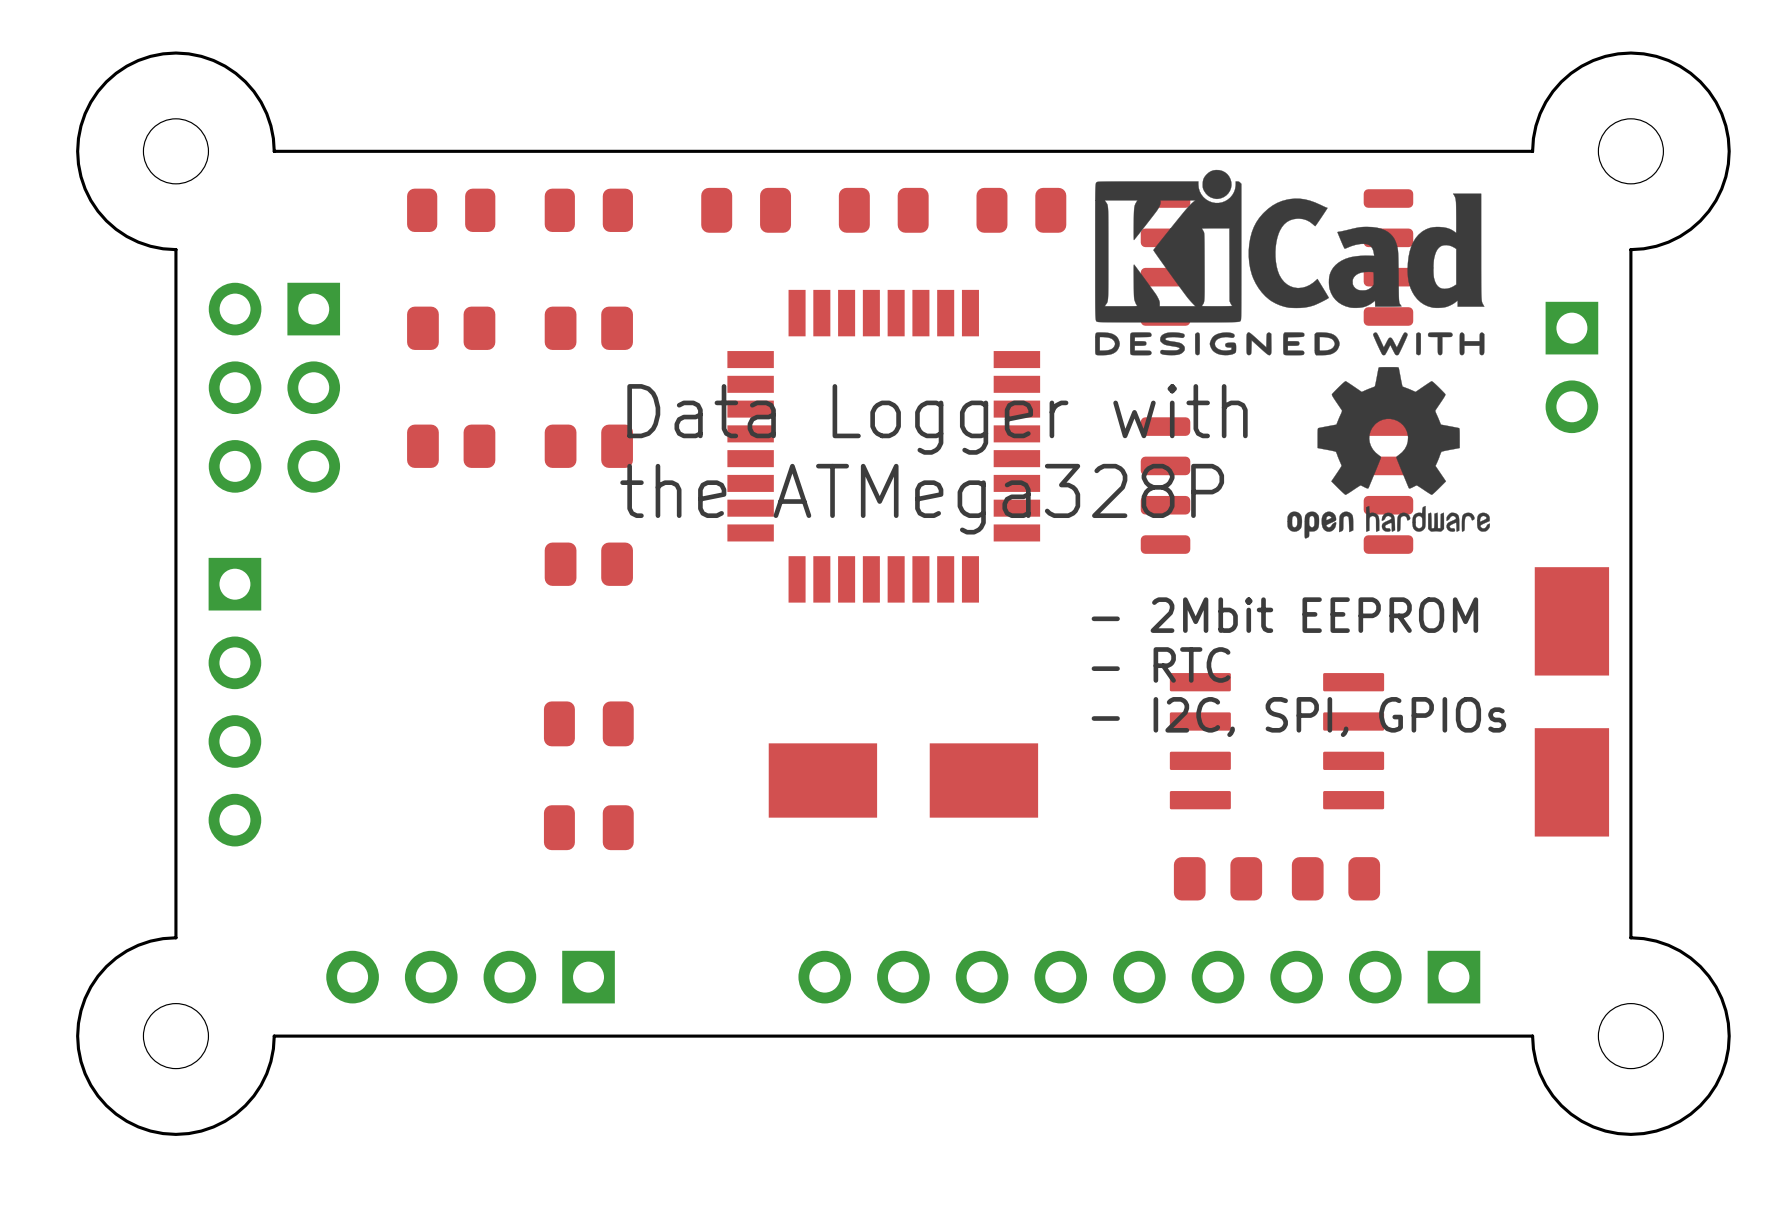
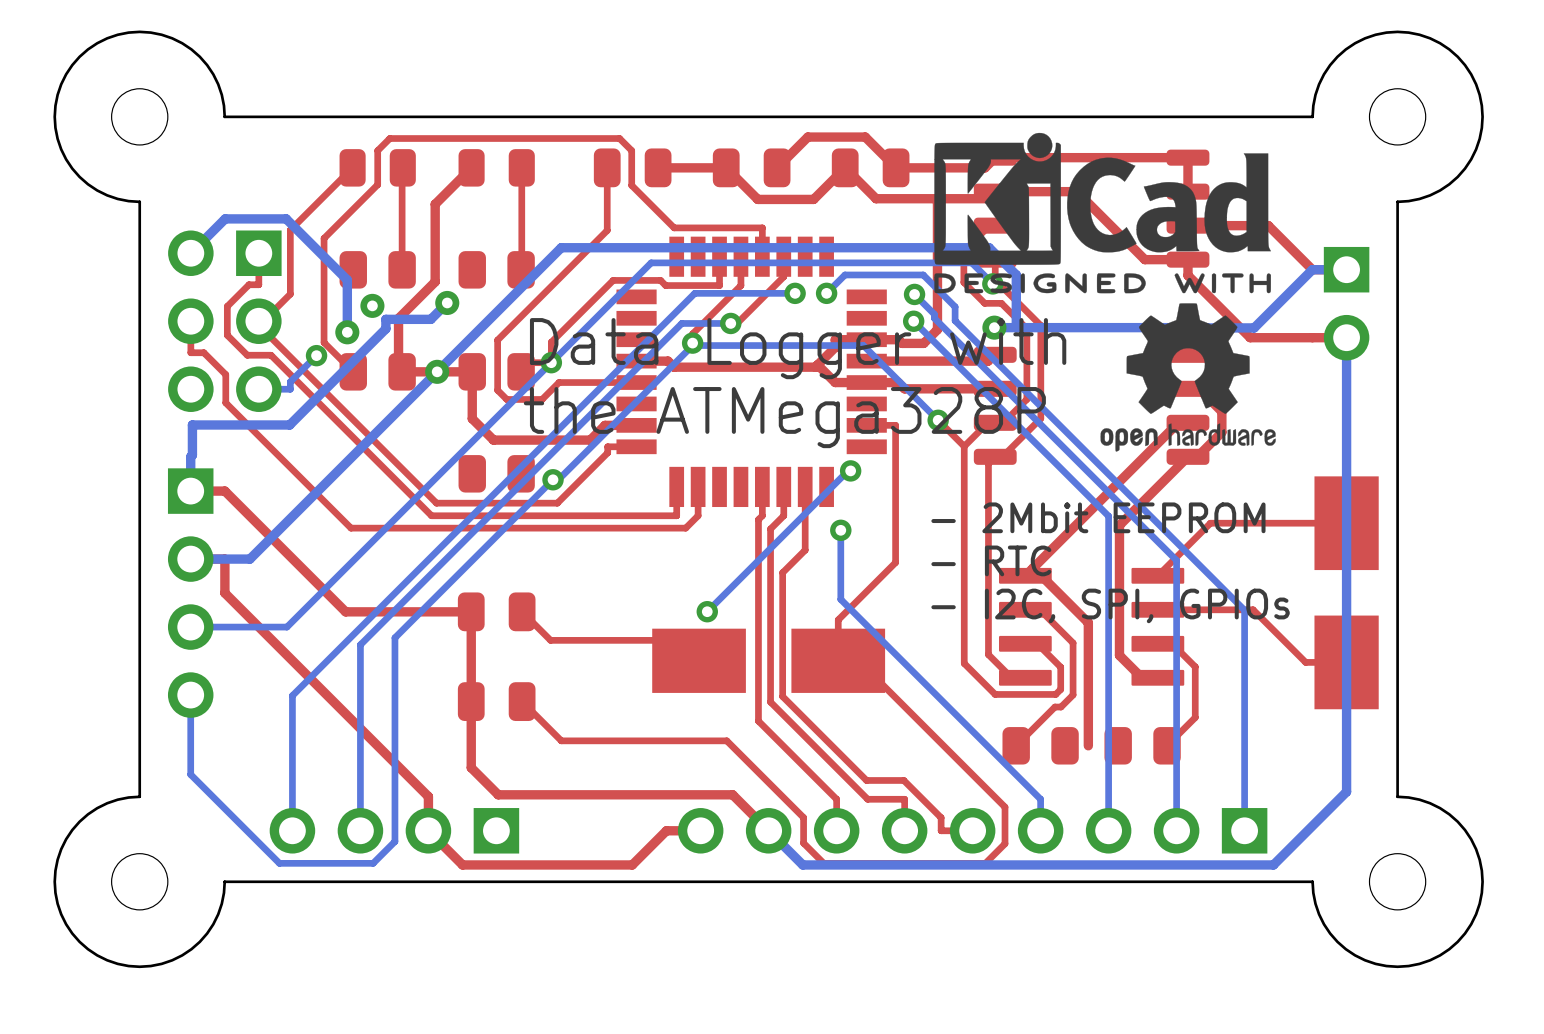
top track: none -> (352, 167) (290, 230) (290, 294) (263, 321)
top track: none -> (402, 167) (402, 269)
top track: none -> (471, 167) (435, 204) (435, 281) (398, 318) (398, 368) (402, 371) (472, 371) (472, 418) (493, 440) (590, 440) (605, 425) (636, 425)
top track: none -> (521, 167) (521, 269)
top track: none -> (607, 167) (607, 230) (497, 340) (497, 390) (506, 399) (542, 399) (559, 382) (636, 382)
top track: none -> (658, 167) (726, 167) (757, 199) (813, 199) (845, 167) (876, 198) (988, 198) (995, 191) (1076, 191) (1144, 259) (1187, 259) (1187, 275) (1250, 337) (1346, 337)
top track: none -> (777, 167) (807, 137) (865, 137) (896, 167) (985, 167) (995, 157) (1187, 157) (1187, 225) (1268, 225) (1312, 269) (1346, 269)
top track: none -> (937, 198) (937, 329) (923, 343) (901, 343) (898, 339) (835, 339) (835, 347) (815, 367) (674, 367) (668, 361) (636, 361)
top track: none -> (995, 225) (989, 225) (963, 251) (963, 282) (984, 303) (1001, 303) (1026, 328) (1026, 399) (1003, 422) (987, 422) (964, 446)
bottom track: none -> (190, 253) (225, 218) (286, 218) (347, 280) (347, 332)
top track: none -> (258, 253) (258, 284) (248, 284) (227, 306) (227, 335) (247, 355) (271, 355) (431, 515) (676, 515) (676, 486)
top track: none -> (719, 256) (719, 285) (665, 285) (660, 280) (613, 280) (551, 342) (551, 362) (530, 362) (521, 371)
top track: none -> (740, 256) (740, 285) (692, 333) (692, 343)
top track: none -> (762, 256) (762, 227) (674, 227) (631, 185) (631, 150) (619, 138) (389, 138) (377, 150) (377, 184) (324, 238) (324, 342) (353, 371)
top track: none -> (783, 256) (783, 276) (737, 323) (730, 323)
top track: none -> (995, 259) (995, 281) (992, 283) (999, 283) (1040, 325) (1040, 418) (1002, 456) (995, 456) (988, 463) (988, 654) (1011, 677) (1025, 677)
bottom track: none -> (1346, 269) (1312, 269) (1254, 327) (1206, 327)
bottom track: none -> (992, 283) (971, 262) (651, 262) (286, 627) (190, 627)
via: none -> (992, 283)
bottom track: none -> (795, 293) (694, 293) (292, 695) (292, 830)
via: none -> (795, 293)
bottom track: none -> (826, 293) (844, 274) (923, 274) (955, 306) (955, 320) (1244, 610) (1244, 830)
via: none -> (826, 293)
bottom track: none -> (914, 294) (934, 314) (934, 318) (1176, 560) (1176, 830)
via: none -> (914, 294)
bottom track: none -> (447, 302) (430, 319) (385, 319) (385, 328) (289, 424) (192, 424) (190, 491)
via: none -> (447, 302)
via: none -> (372, 305)
top track: none -> (190, 321) (190, 352) (203, 352) (225, 374) (225, 402) (351, 528) (685, 528) (698, 515) (698, 486)
top track: none -> (263, 321) (263, 329) (436, 503) (557, 503) (607, 452) (607, 446) (636, 446)
bottom track: none -> (913, 321) (1108, 516) (1108, 830)
via: none -> (913, 321)
bottom track: none -> (730, 323) (681, 323) (360, 644) (360, 830)
via: none -> (730, 323)
via: none -> (994, 327)
bottom track: none -> (1016, 327) (1016, 274) (989, 247) (561, 247) (249, 559) (190, 559)
bottom track: none -> (1206, 327) (994, 327)
via: none -> (347, 332)
bottom track: none -> (1346, 337) (1346, 791) (1273, 864) (802, 864) (768, 830)
via: none -> (692, 343)
bottom track: none -> (692, 345) (863, 345) (938, 420)
bottom track: none -> (692, 345) (558, 479) (553, 479) (394, 637) (394, 841) (373, 863) (279, 863) (190, 774) (190, 695)
top track: none -> (995, 354) (988, 361) (866, 361)
bottom track: none -> (316, 355) (290, 381) (290, 389) (258, 389)
via: none -> (316, 355)
via: none -> (551, 362)
top track: none -> (817, 364) (835, 382) (898, 382) (904, 388) (995, 388)
via: none -> (437, 371)
top track: none -> (1187, 388) (1199, 388) (1221, 411) (1221, 432) (1197, 456) (1187, 456) (1119, 525) (1119, 655) (1141, 677) (1157, 677)
top track: none -> (938, 420) (964, 446)
via: none -> (938, 420)
top track: none -> (1187, 422) (1178, 422) (1033, 567)
top track: none -> (866, 425) (895, 425) (895, 562) (838, 619) (838, 660)
top track: none -> (964, 446) (964, 663) (995, 694) (1055, 694) (1060, 689) (1060, 667) (1037, 643) (1025, 643)
bottom track: none -> (850, 470) (848, 470) (707, 611)
via: none -> (850, 470)
via: none -> (553, 479)
top track: none -> (762, 486) (762, 515) (758, 519) (758, 721) (836, 799) (836, 830)
top track: none -> (783, 486) (783, 515) (770, 528) (770, 702) (867, 799) (904, 799) (904, 830)
top track: none -> (805, 486) (805, 550) (782, 572) (782, 696) (866, 780) (903, 780) (941, 817) (941, 830) (972, 830)
top track: none -> (190, 491) (224, 491) (345, 611) (471, 611) (471, 767) (498, 794) (732, 794) (768, 830)
top track: none -> (1346, 523) (1210, 523) (1157, 575)
bottom track: none -> (840, 530) (840, 599) (1040, 799) (1040, 830)
via: none -> (840, 530)
top track: none -> (190, 559) (224, 559) (224, 593) (428, 796) (428, 830) (462, 864) (632, 864) (666, 830) (700, 830)
top track: none -> (1033, 567) (1088, 622) (1088, 745)
top track: none -> (1025, 609) (1039, 609) (1073, 642) (1073, 694) (1061, 707) (1054, 707) (1016, 745)
top track: none -> (1157, 609) (1253, 609) (1305, 662) (1346, 662)
top track: none -> (522, 611) (550, 640) (699, 640)
via: none -> (707, 611)
top track: none -> (838, 640) (1005, 807) (1005, 843) (985, 863) (823, 863) (803, 843) (803, 817) (726, 740) (561, 740) (522, 701)
top track: none -> (1157, 643) (1172, 643) (1195, 666) (1195, 717) (1167, 745)

